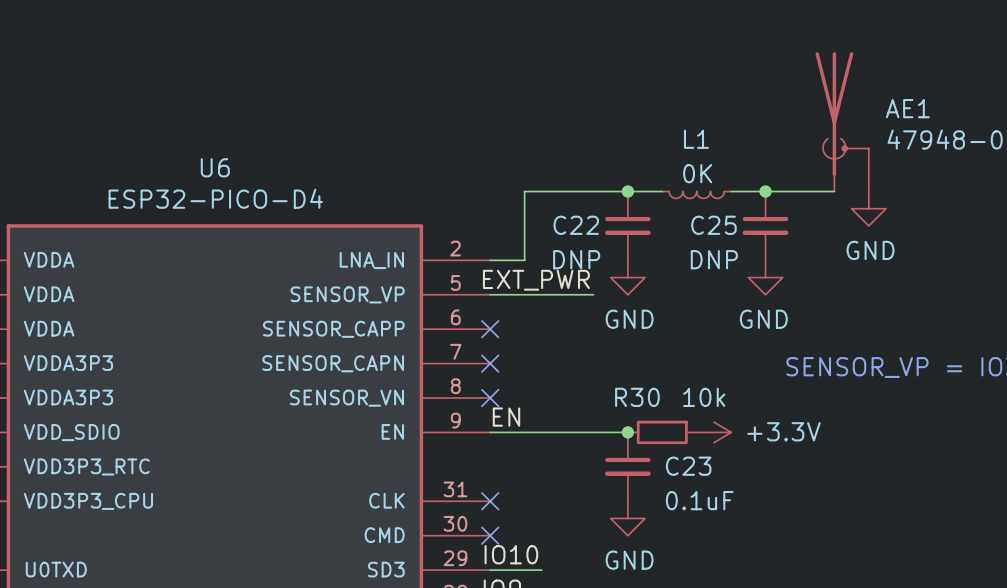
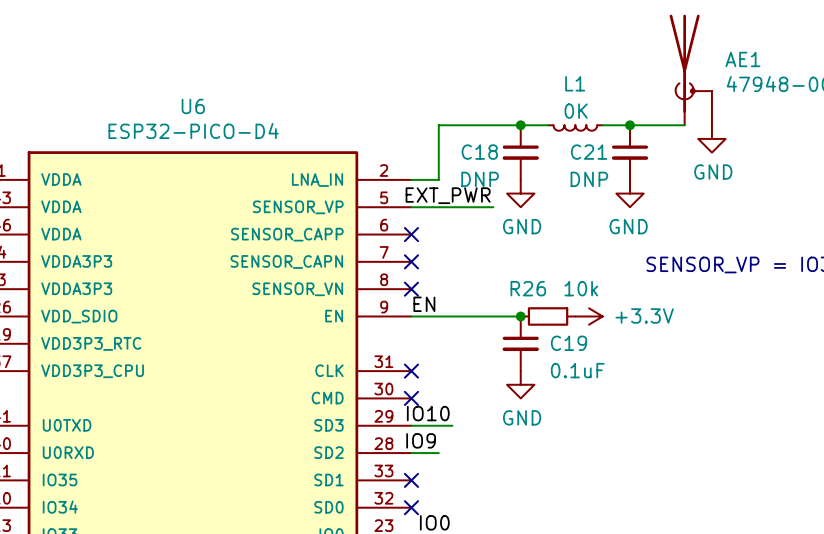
C22 name: C22 (576, 225) -> C18 (479, 152)
C25 name: C25 (713, 225) -> C21 (589, 152)
R30 name: R30 (637, 397) -> R26 (528, 288)
C23 name: C23 (688, 466) -> C19 (568, 343)

